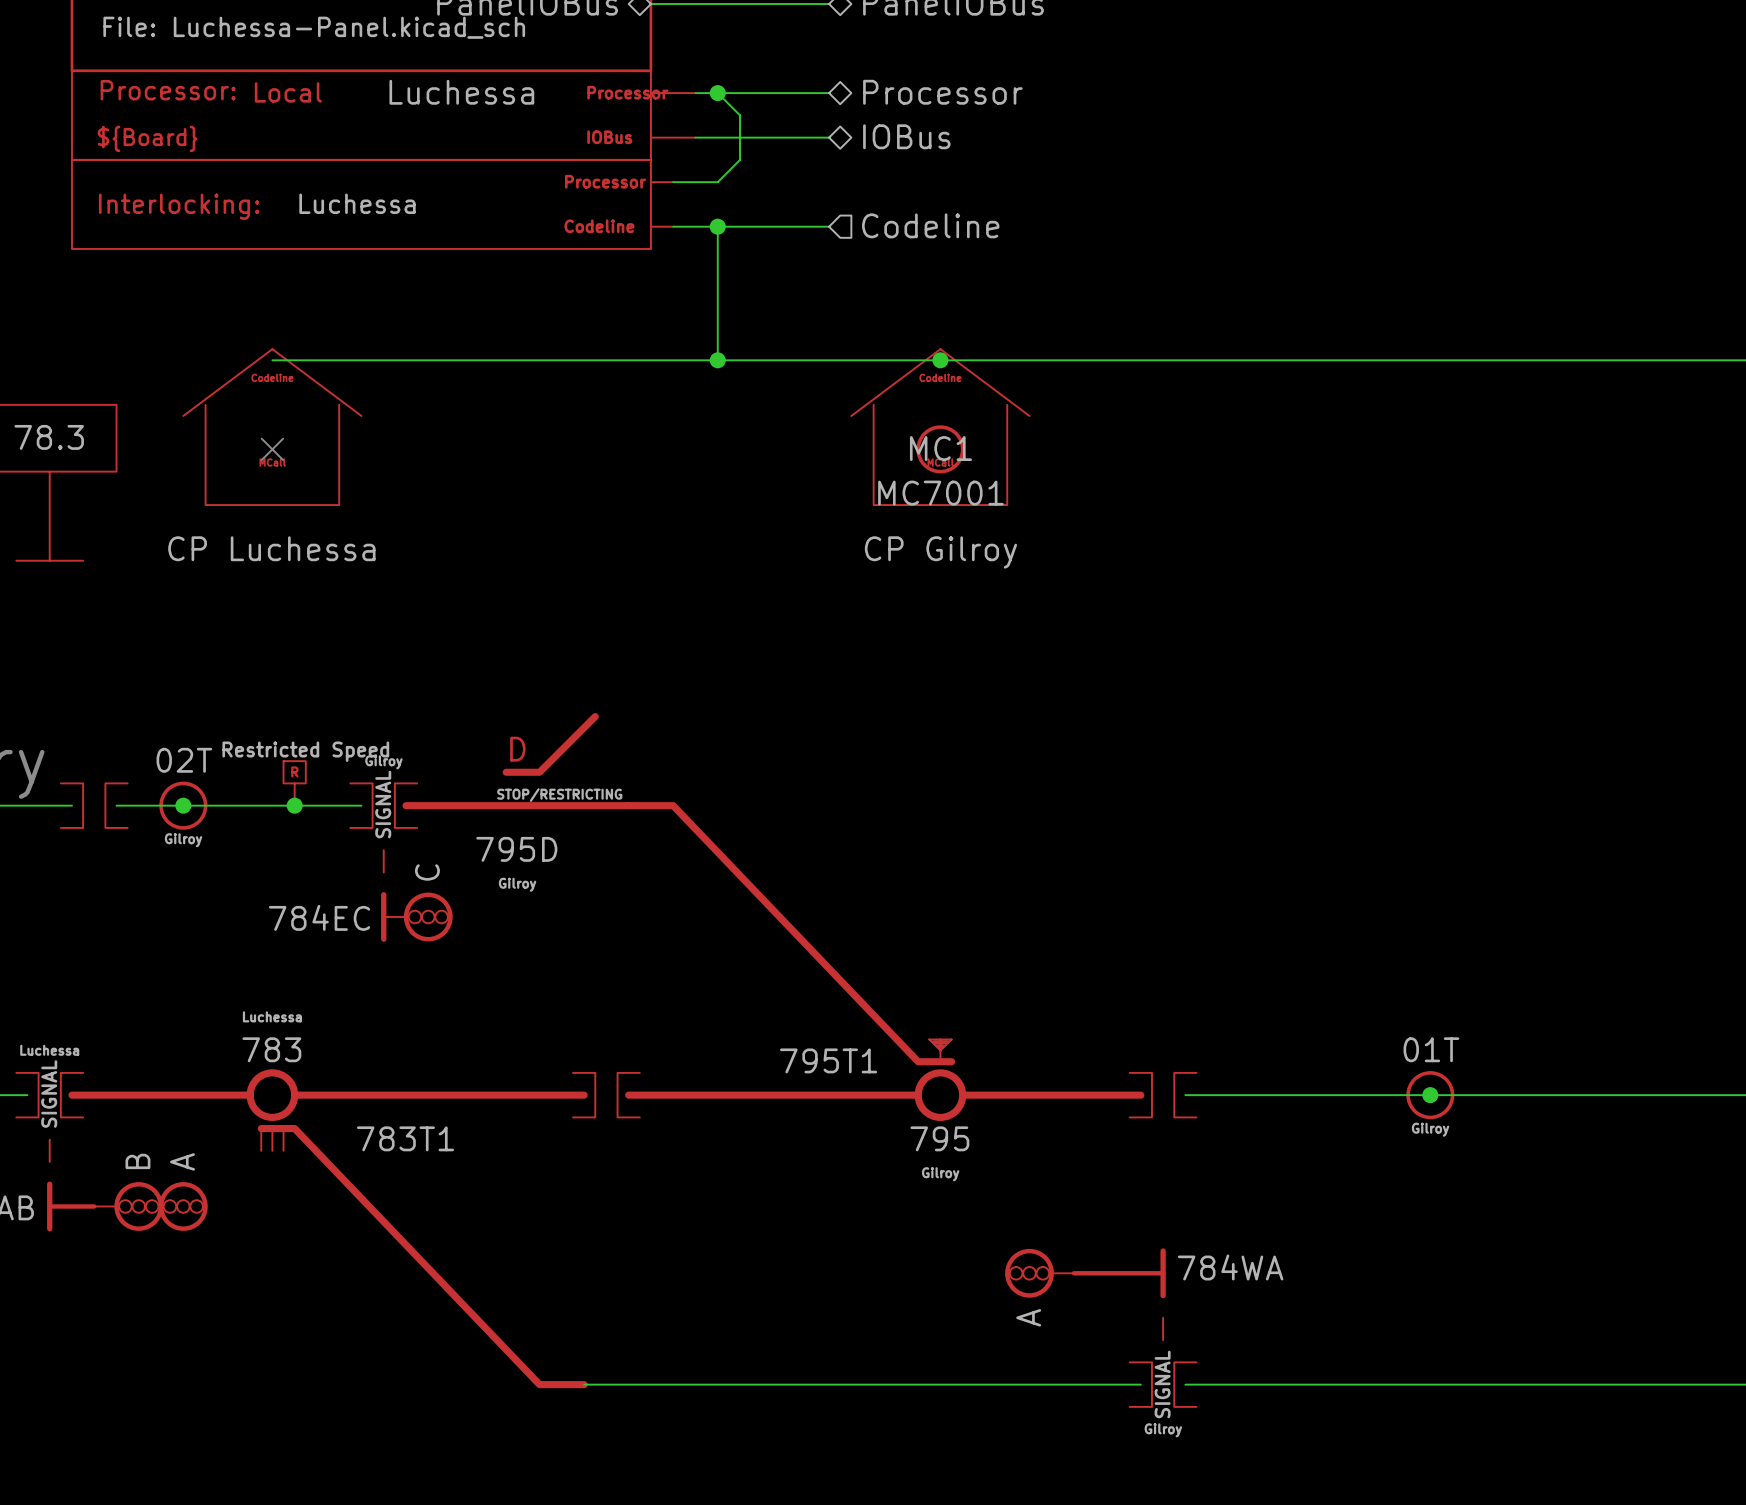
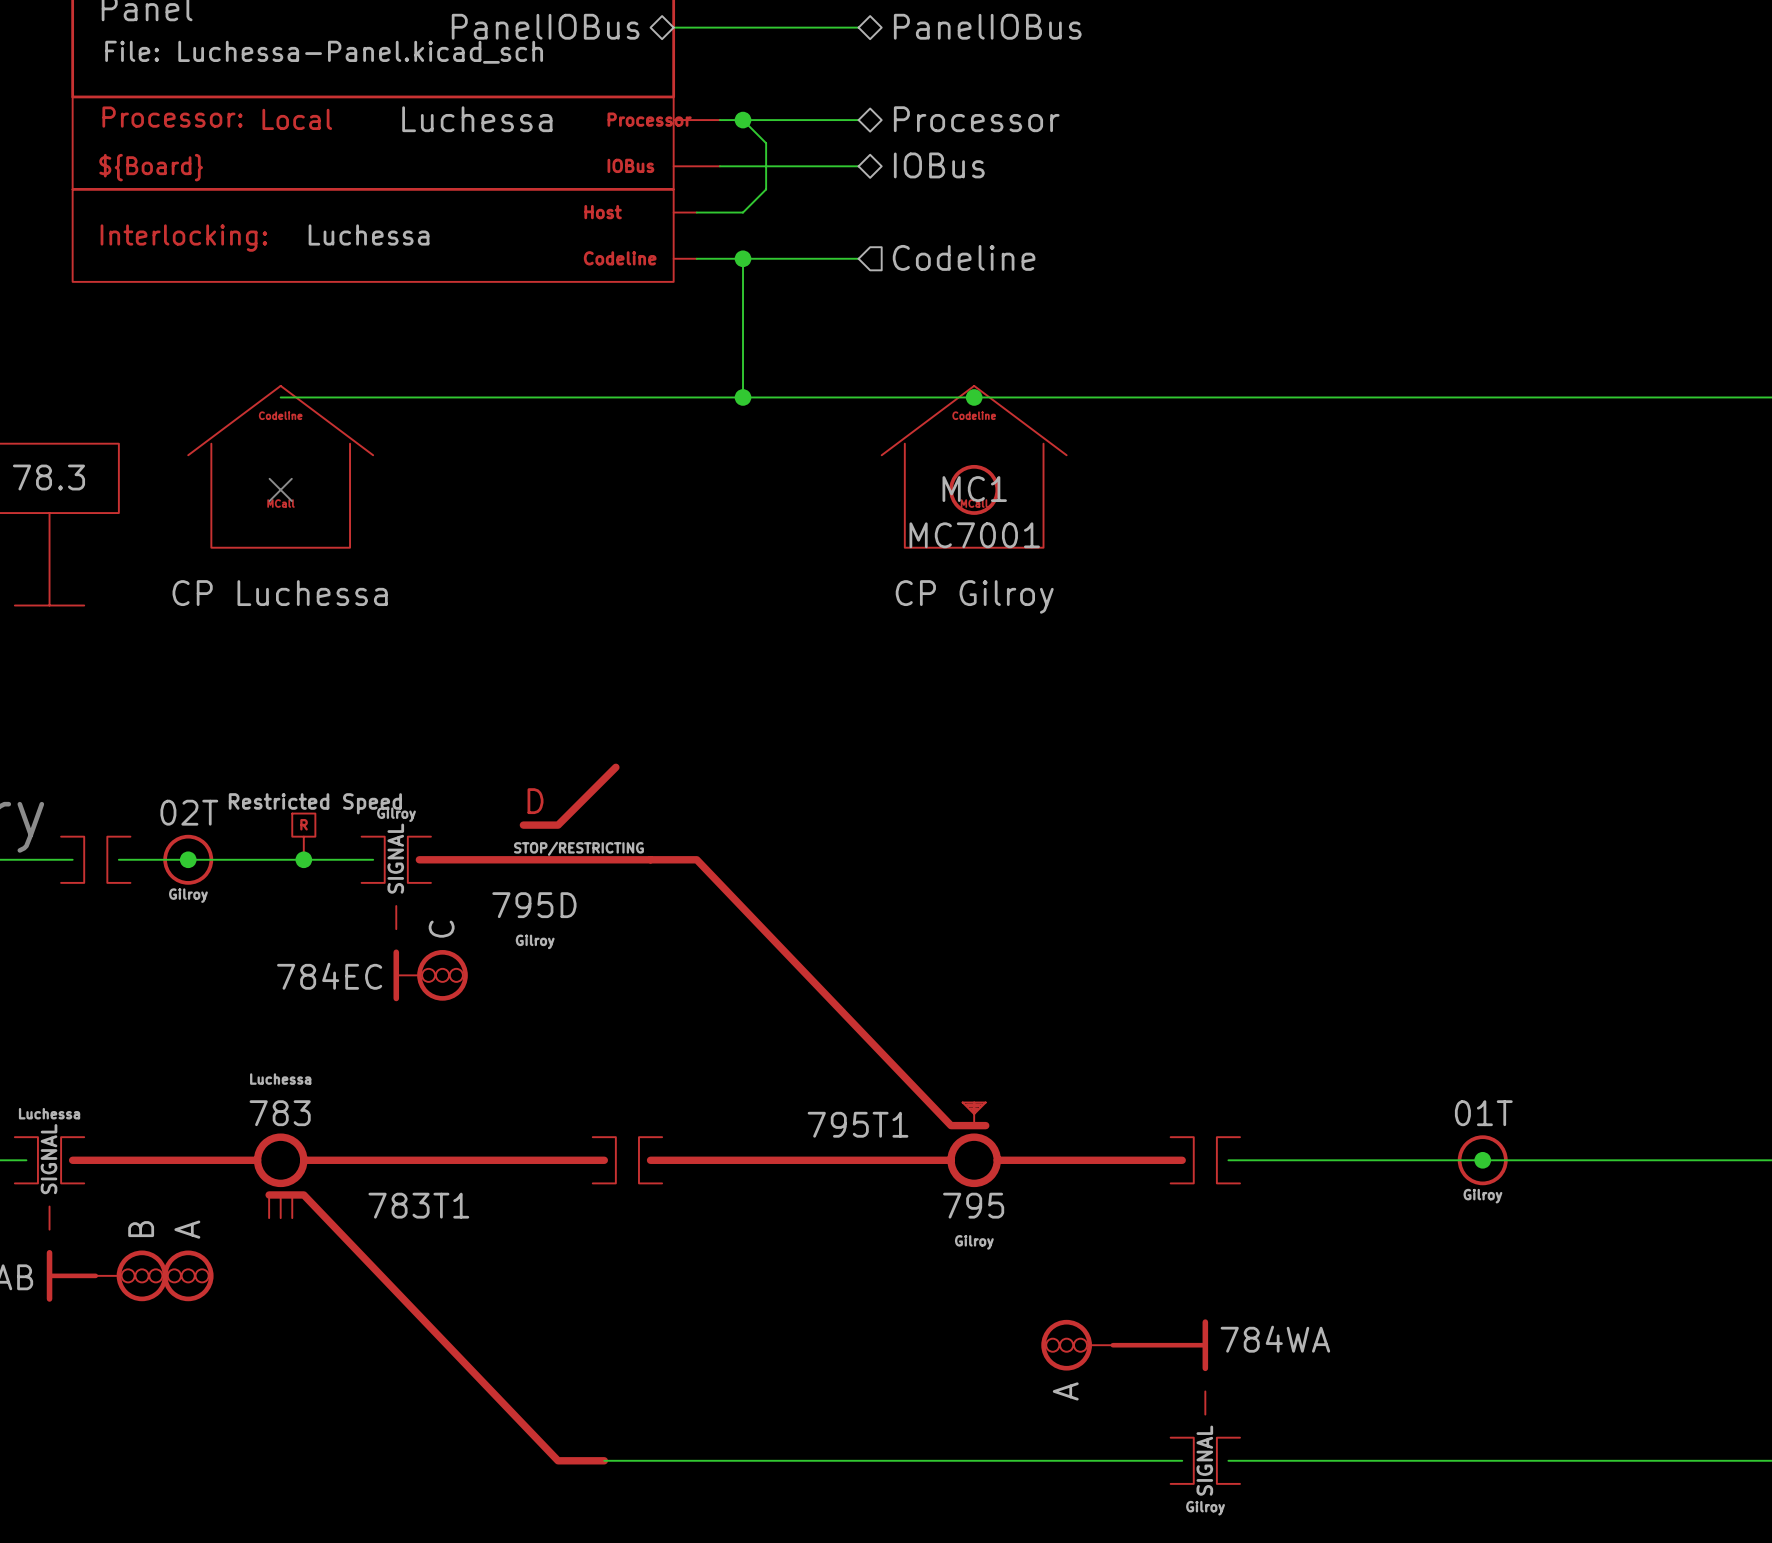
part text: Processor (605, 181) -> Host (603, 212)

